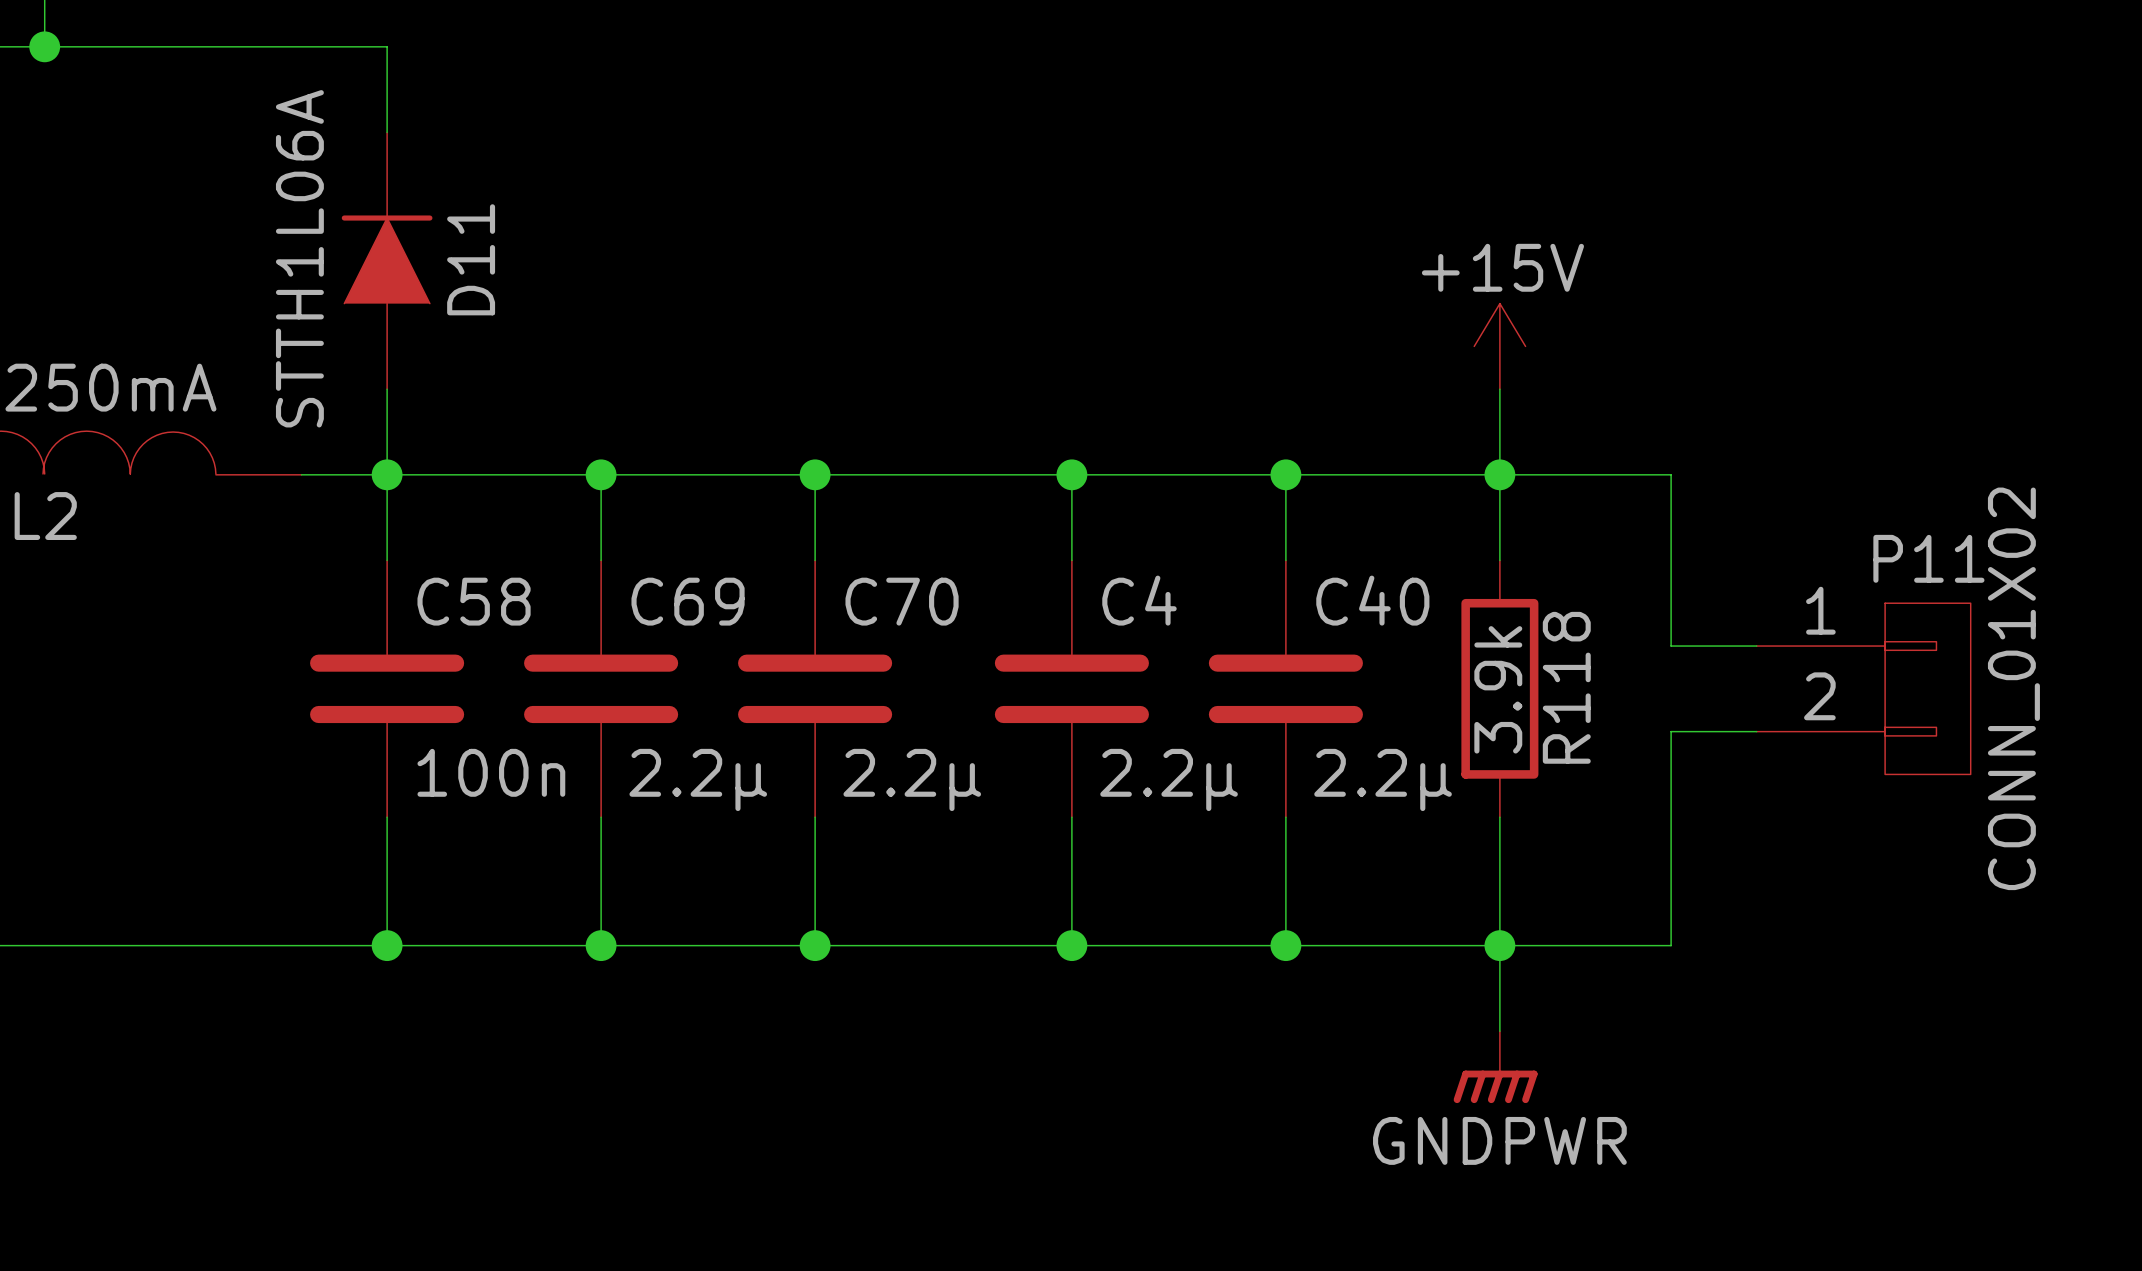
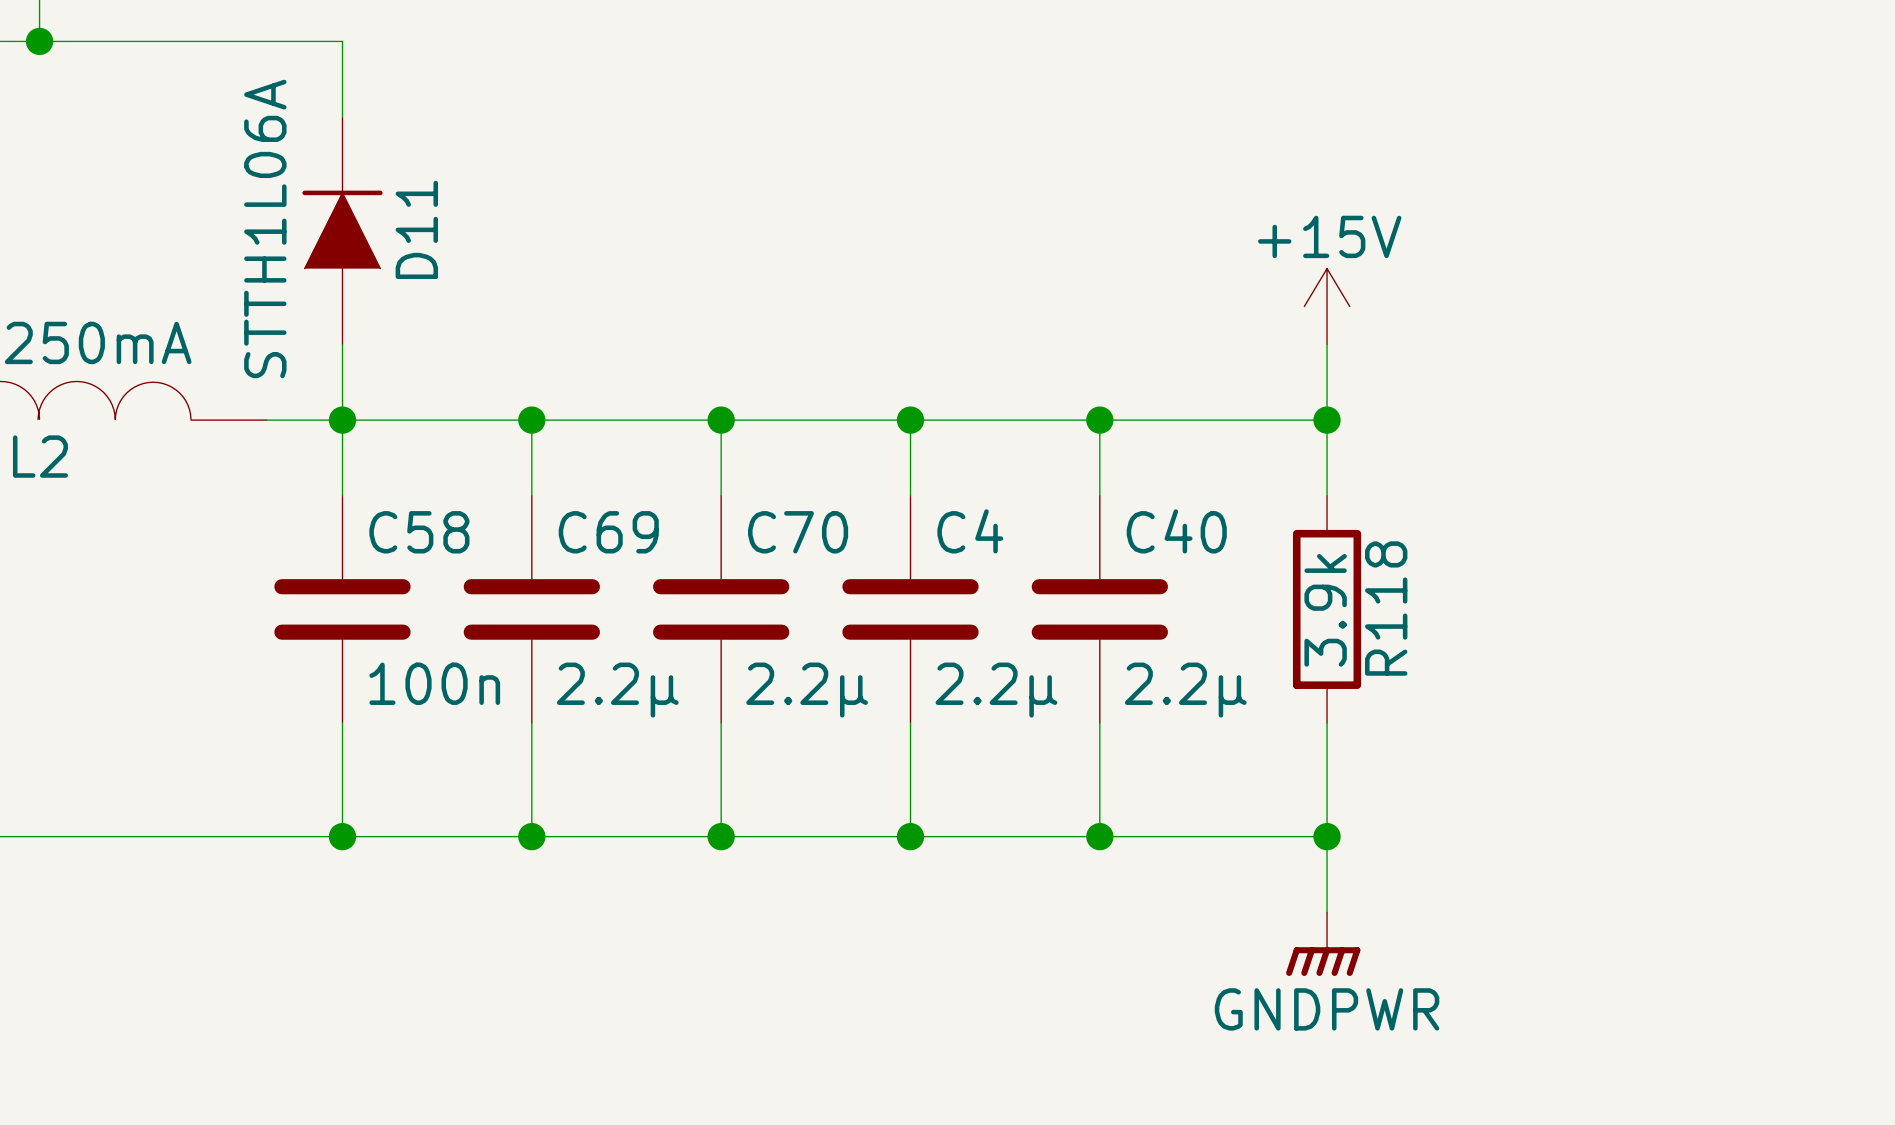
wire: (1071, 474) (1071, 560) -> (910, 420) (910, 495)
junction position: (1071, 474) -> (910, 420)
wire: (1285, 474) (1285, 560) -> (1099, 420) (1099, 495)
junction position: (1285, 474) -> (1099, 420)
wire: (1499, 474) (1671, 474) (1671, 646) (1756, 646) -> none
C4 position: (1071, 688) -> (910, 609)
C40 position: (1285, 688) -> (1099, 609)
P11: CONN_01X02 (1863, 688) -> none
wire: (1756, 731) (1671, 731) (1671, 945) (1499, 945) -> none
wire: (1071, 817) (1071, 945) -> (910, 723) (910, 836)
wire: (1285, 817) (1285, 945) -> (1099, 723) (1099, 836)
junction position: (1071, 945) -> (910, 836)
junction position: (1285, 945) -> (1099, 836)

